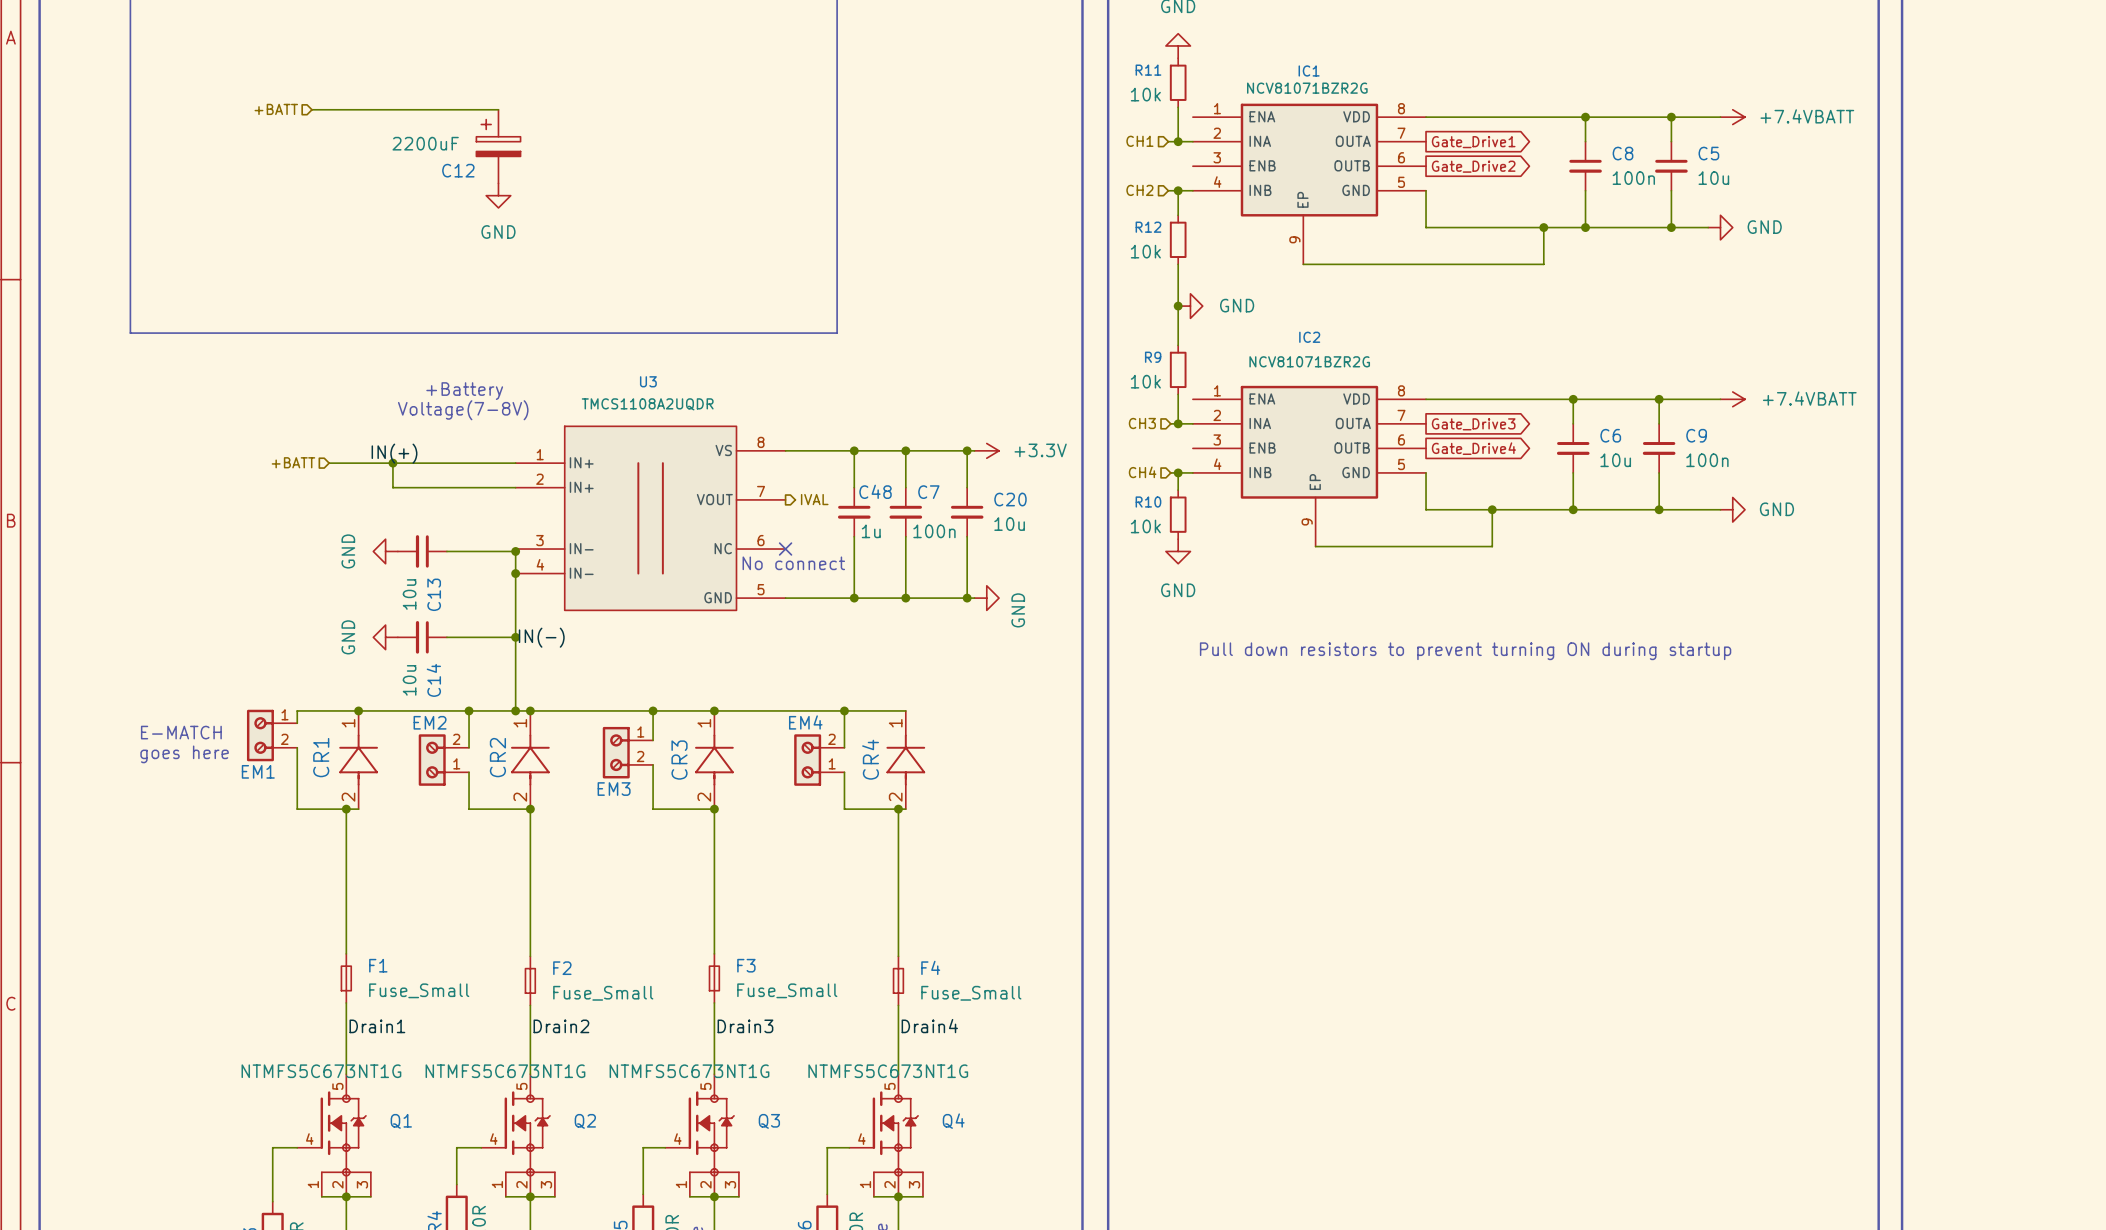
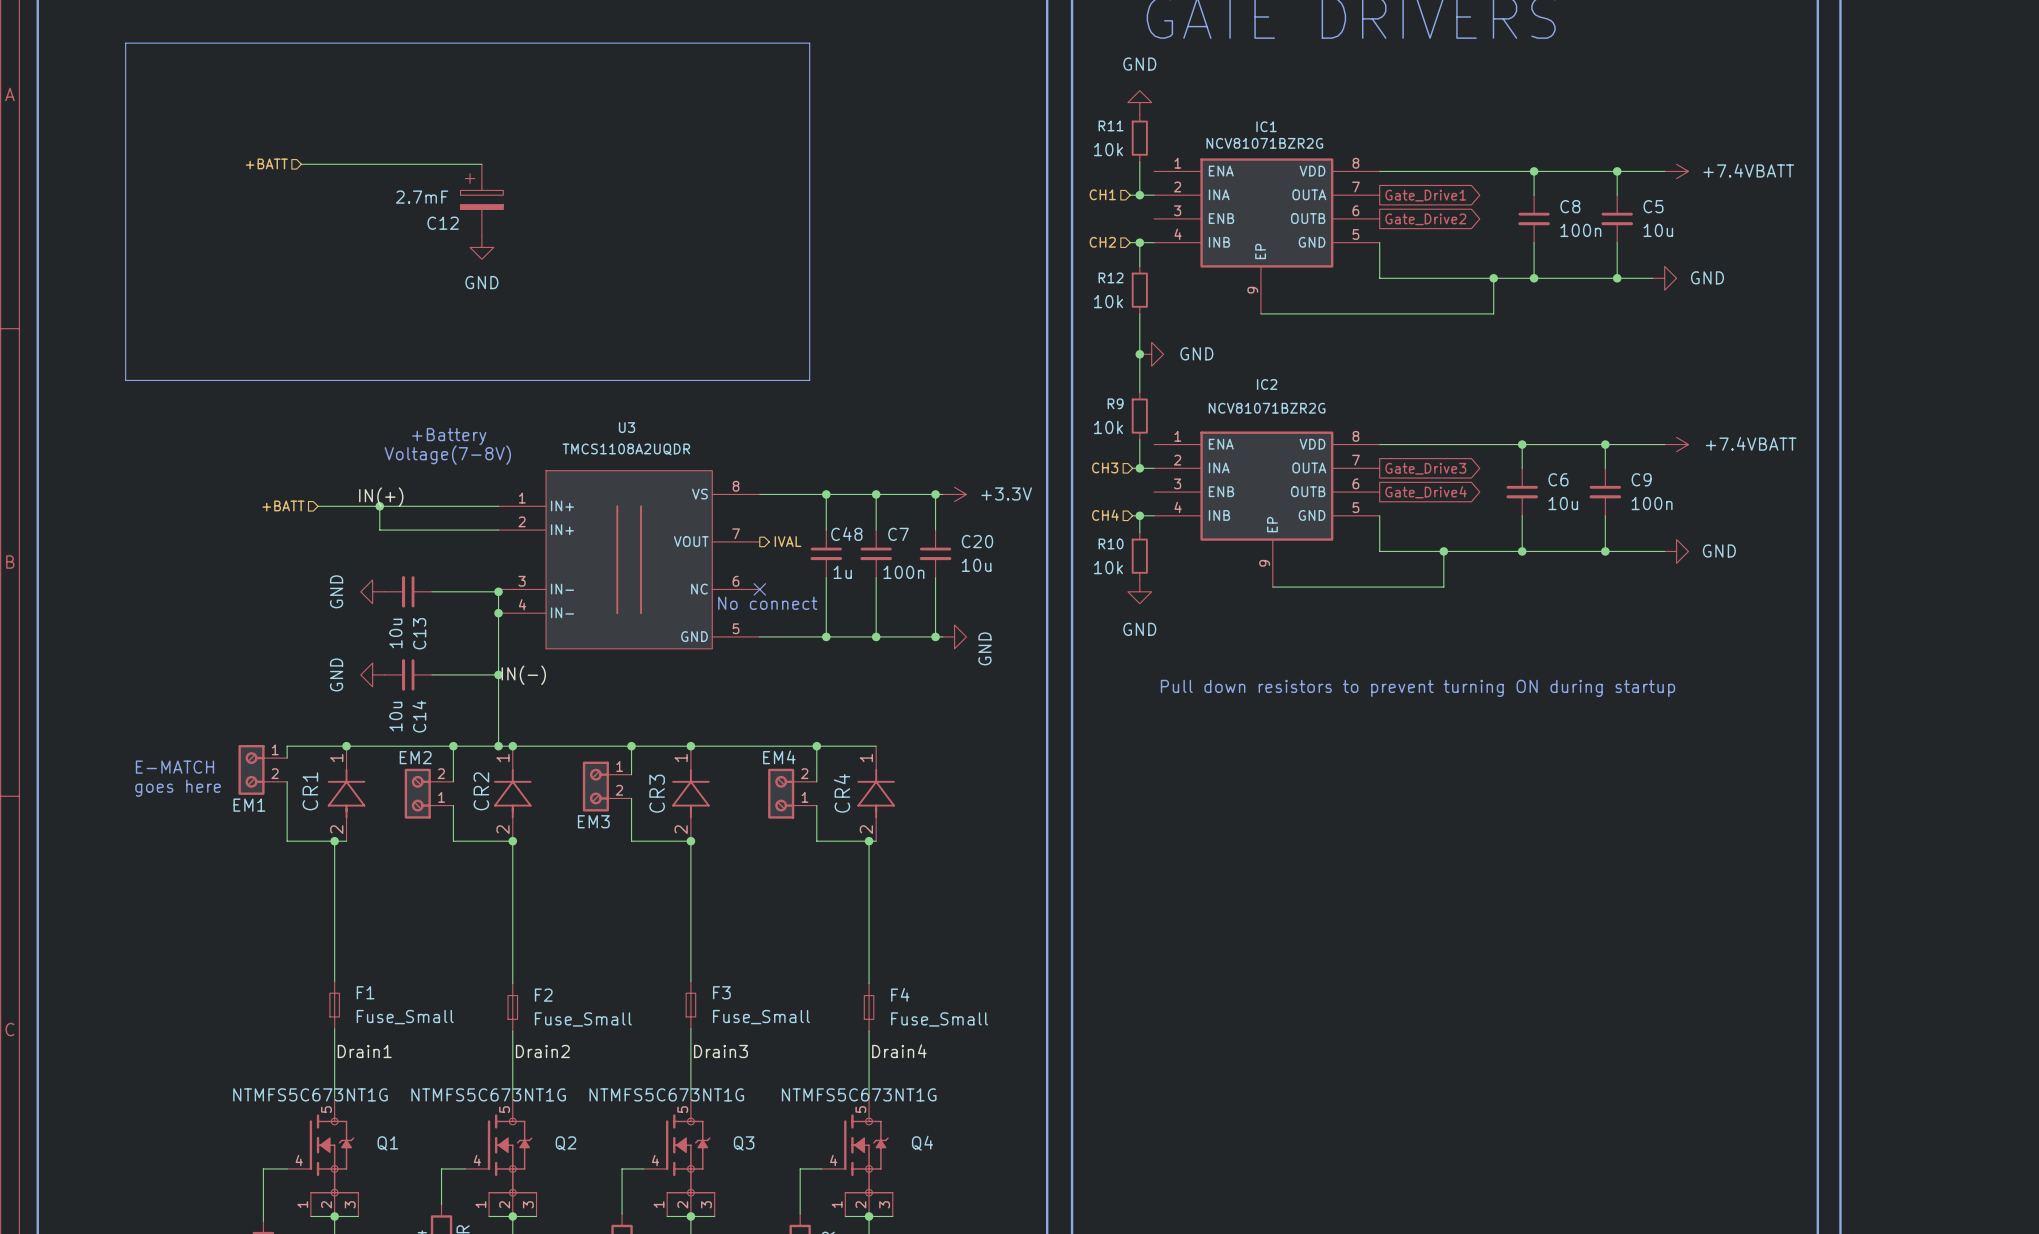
C12 value: 2200uF (425, 143) -> 2.7mF (422, 197)

